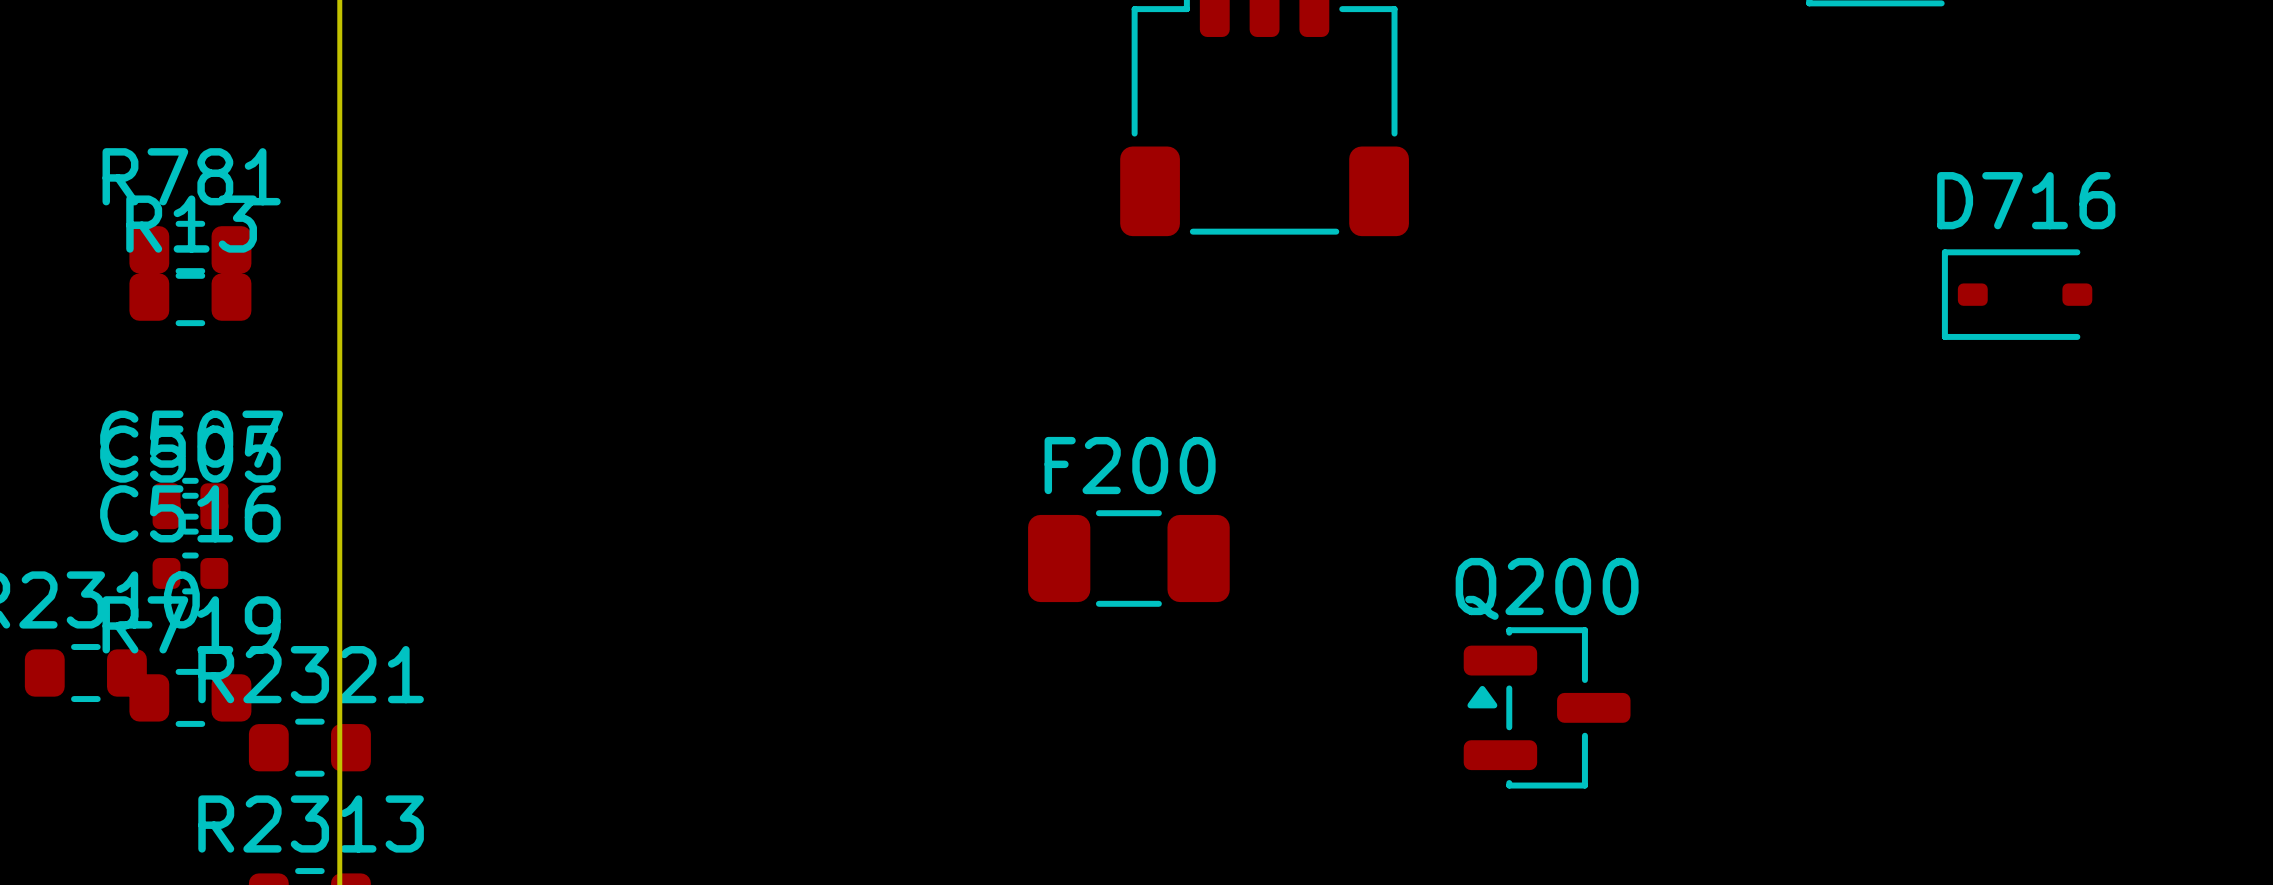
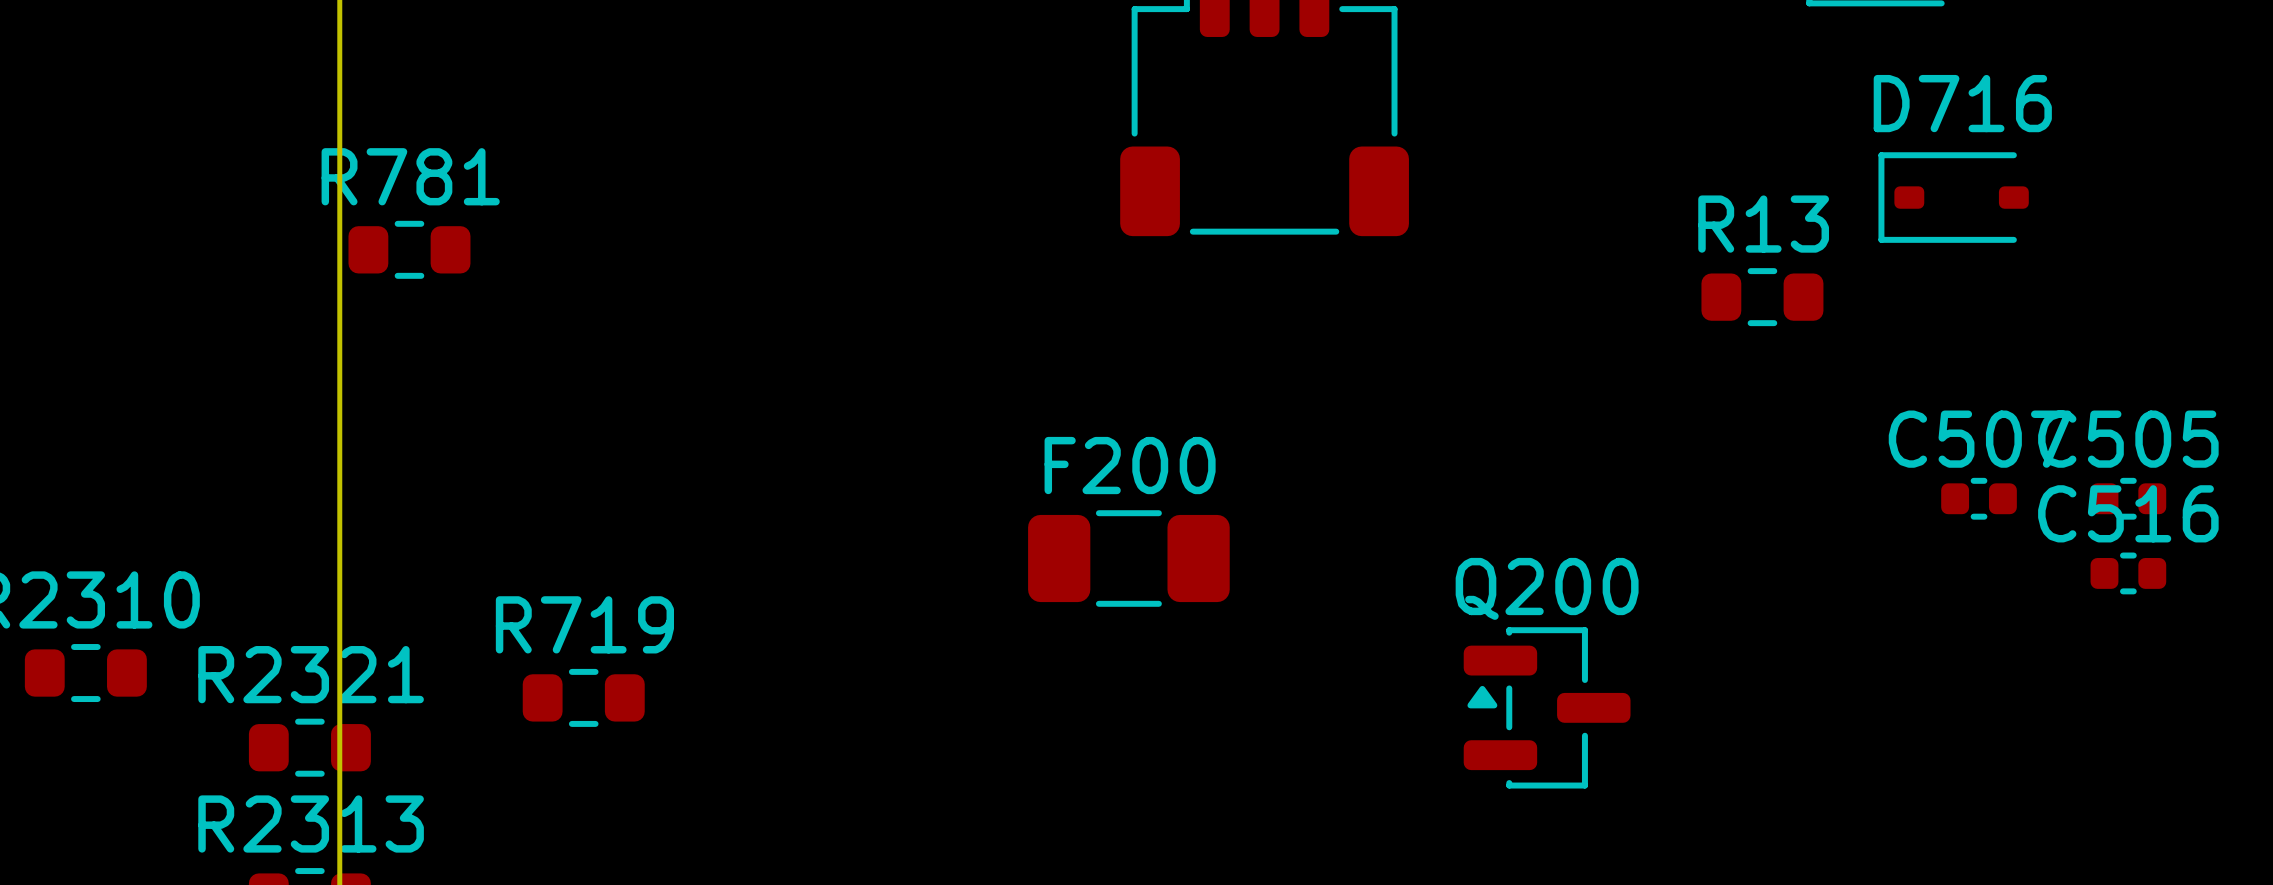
R781 position: (190, 249) -> (409, 249)
D716 position: (2017, 294) -> (1953, 197)
R13 position: (190, 297) -> (1762, 297)
C507 position: (190, 498) -> (1979, 498)
C505 position: (190, 513) -> (2128, 498)
C516 position: (190, 573) -> (2128, 573)
R719 position: (190, 697) -> (583, 697)

